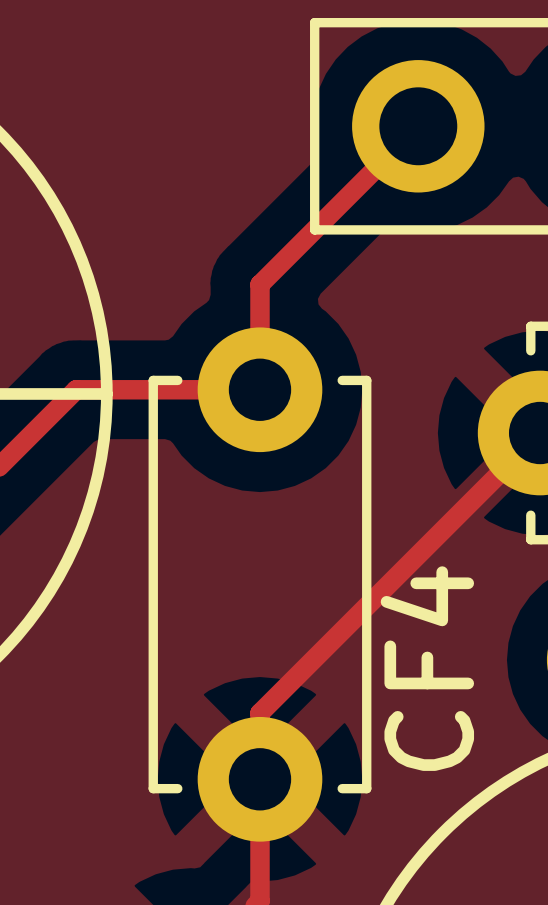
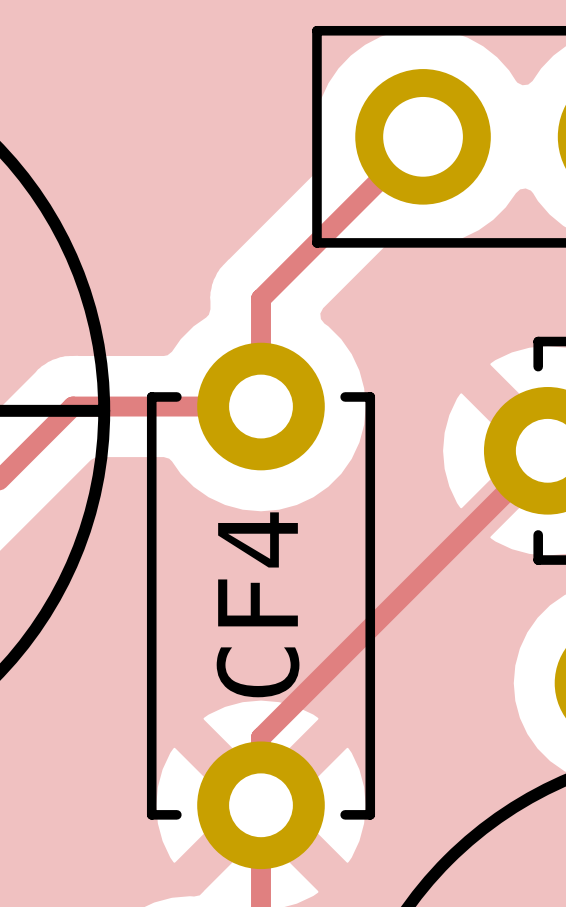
CF4 name position: CF4 (427, 668) -> CF4 (258, 604)

